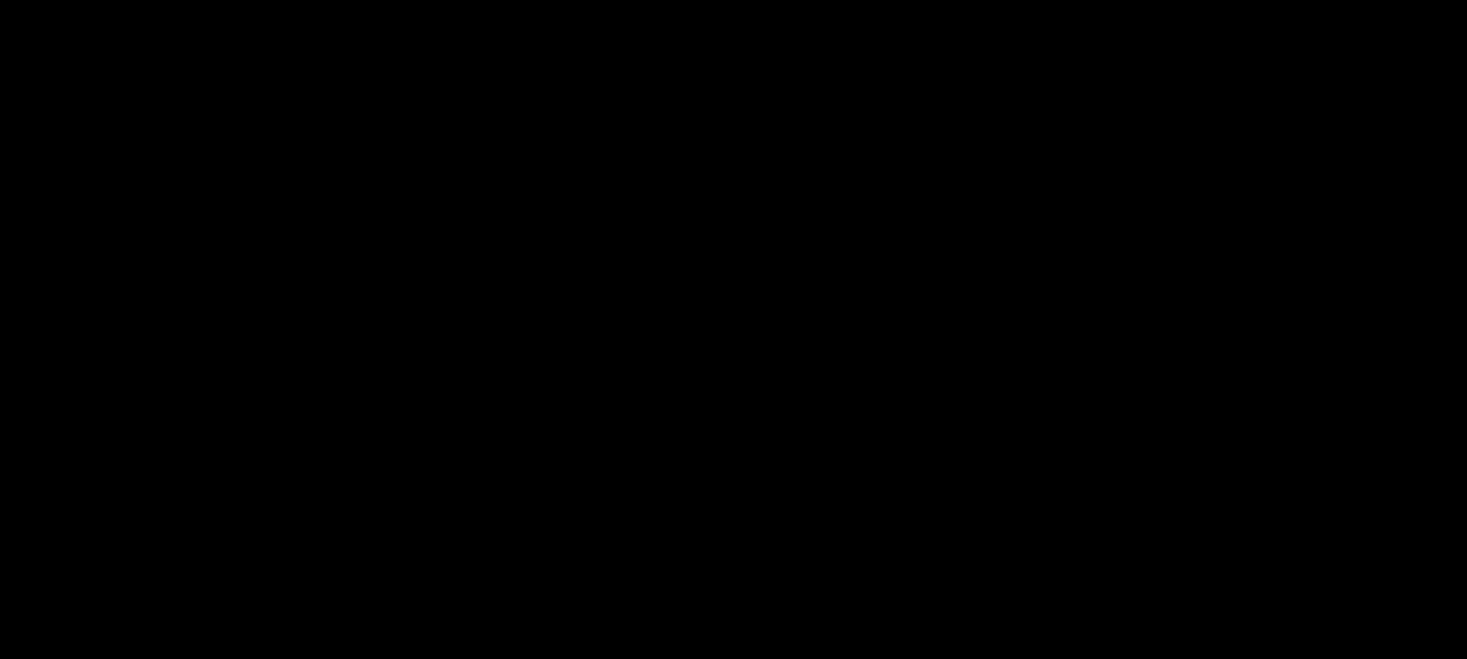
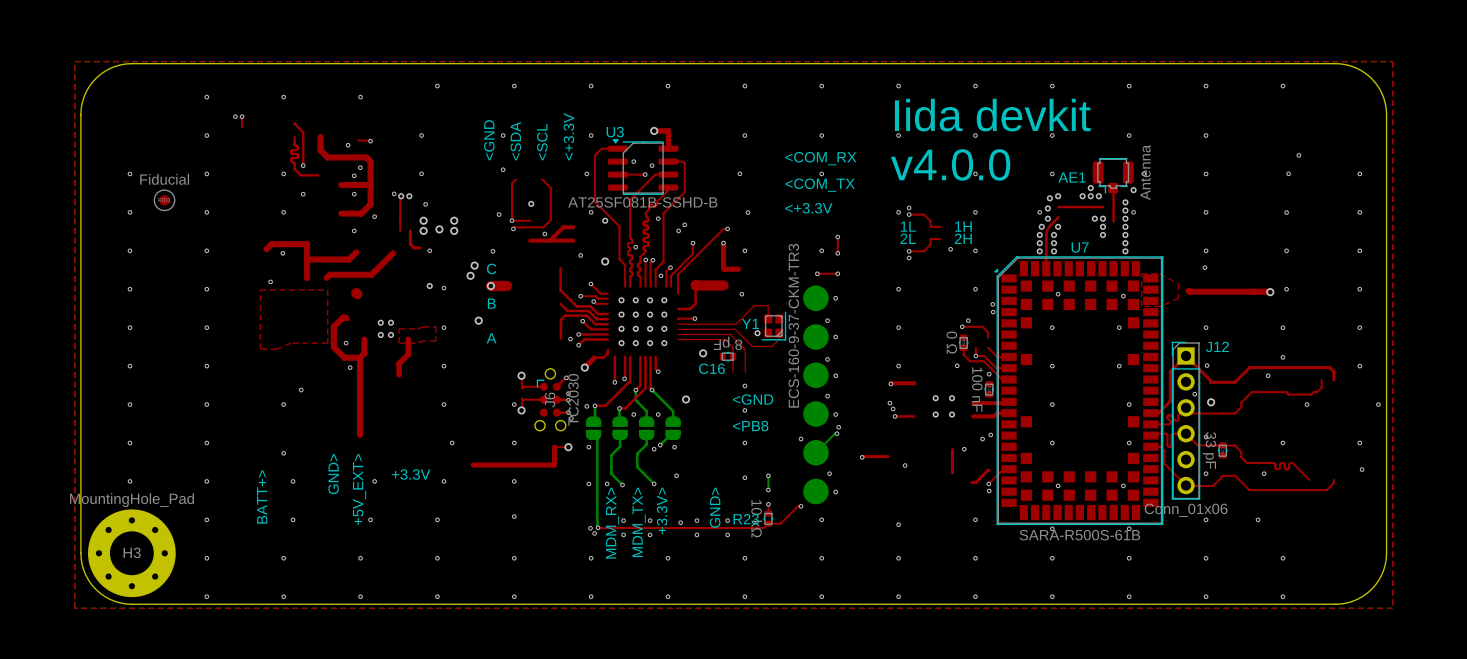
top zone outline: none -> (74, 61) (1392, 61) (1392, 608) (74, 608) (74, 61)
board edge: none -> (131, 63) (1335, 63) (1352, 66) (1367, 74) (1375, 82) (1383, 97) (1386, 108) (1386, 553) (1383, 570) (1375, 585) (1362, 596) (1346, 602) (1335, 604) (131, 604) (115, 601) (100, 593) (92, 585) (83, 570) (81, 558) (80, 114) (83, 97) (95, 78) (115, 66) (131, 63)
via: none -> (437, 86)
via: none -> (514, 86)
via: none -> (591, 86)
via: none -> (668, 86)
via: none -> (744, 86)
via: none -> (821, 86)
via: none -> (898, 86)
via: none -> (975, 86)
via: none -> (1052, 86)
via: none -> (1129, 86)
via: none -> (1206, 86)
via: none -> (1282, 86)
via: none -> (206, 97)
via: none -> (283, 97)
via: none -> (360, 97)
text: none -> Iida devkit (992, 115)
via: none -> (235, 116)
top track: none -> (242, 116) (242, 126)
via: none -> (242, 116)
top track: none -> (294, 123) (303, 132) (303, 165)
text: none -> <+3.3V (568, 136)
top track: none -> (654, 130) (668, 130) (668, 148)
via: none -> (654, 130)
via: none -> (206, 135)
via: none -> (421, 135)
via: none -> (503, 135)
via: none -> (591, 135)
via: none -> (744, 135)
via: none -> (821, 135)
via: none -> (898, 135)
via: none -> (975, 135)
via: none -> (1052, 135)
via: none -> (1129, 135)
via: none -> (1206, 135)
top track: none -> (294, 137) (296, 145)
top track: none -> (320, 137) (320, 150) (327, 157) (366, 157) (370, 161) (370, 204) (361, 213) (341, 213)
text: none -> <GND (489, 140)
text: none -> <SDA (515, 141)
text: none -> <SCL (542, 142)
top track: none -> (358, 140) (370, 141)
via: none -> (370, 141)
top track: none -> (296, 145) (297, 149) (292, 150) (291, 152) (297, 154) (297, 156) (291, 158) (292, 162)
via: none -> (348, 145)
top track: none -> (617, 148) (601, 148) (594, 155) (594, 201) (619, 226) (619, 259) (625, 265) (625, 286)
via: none -> (1298, 155)
text: none -> <COM_RX (820, 158)
via: none -> (633, 161)
top track: none -> (668, 161) (682, 161) (684, 163) (684, 192) (663, 213) (663, 261) (655, 269) (655, 286)
top track: none -> (292, 162) (294, 169) (300, 175) (318, 175)
text: none -> v4.0.0 (950, 164)
via: none -> (303, 165)
via: none -> (652, 165)
U3: none -> AT25SF081B-SSHD-B (643, 166)
via: none -> (360, 167)
via: none -> (503, 169)
via: none -> (129, 173)
via: none -> (206, 173)
via: none -> (283, 173)
via: none -> (421, 173)
via: none -> (586, 173)
via: none -> (739, 173)
via: none -> (821, 173)
via: none -> (975, 173)
via: none -> (1052, 173)
via: none -> (1143, 173)
via: none -> (1206, 173)
via: none -> (1288, 173)
via: none -> (1359, 173)
top track: none -> (617, 174) (645, 174)
via: none -> (645, 174)
top track: none -> (668, 174) (655, 174) (630, 199) (630, 237) (632, 242) (628, 243) (630, 250) (627, 252) (628, 255) (632, 256) (630, 260) (632, 266) (630, 270) (632, 274) (630, 276) (630, 286)
via: none -> (354, 175)
AE1: none -> Antenna (1113, 175)
top track: none -> (516, 179) (511, 183) (511, 220) (530, 220)
top track: none -> (542, 179) (550, 187) (550, 220) (543, 227) (513, 228)
text: none -> <COM_TX (820, 185)
top track: none -> (341, 185) (370, 185)
top track: none -> (668, 187) (668, 190) (656, 202) (656, 205) (654, 206) (650, 204) (645, 212) (648, 220) (644, 221) (643, 224) (647, 225) (648, 228) (644, 229) (643, 232) (647, 233) (648, 236) (644, 238) (643, 240) (647, 242) (648, 244) (643, 246) (645, 251) (640, 256) (640, 262) (637, 264) (640, 268) (637, 274) (640, 276) (640, 286)
via: none -> (1090, 188)
top track: none -> (1113, 188) (1113, 221)
via: none -> (1133, 190)
via: none -> (394, 193)
via: none -> (303, 194)
via: none -> (354, 194)
top track: none -> (401, 196) (400, 230)
via: none -> (401, 196)
via: none -> (409, 196)
via: none -> (1058, 196)
via: none -> (1082, 196)
via: none -> (1090, 196)
via: none -> (1098, 196)
via: none -> (1049, 198)
part: none -> Fiducial (164, 200)
via: none -> (1125, 202)
via: none -> (531, 203)
via: none -> (425, 204)
via: none -> (909, 207)
top track: none -> (1058, 207) (1103, 207)
text: none -> <+3.3V (808, 208)
via: none -> (1047, 208)
via: none -> (1125, 210)
via: none -> (129, 212)
via: none -> (206, 212)
via: none -> (283, 212)
via: none -> (591, 212)
via: none -> (748, 212)
via: none -> (898, 212)
via: none -> (975, 212)
via: none -> (1039, 212)
via: none -> (1133, 212)
via: none -> (1206, 212)
via: none -> (1286, 212)
via: none -> (1359, 212)
via: none -> (499, 214)
top track: none -> (909, 214) (923, 214) (930, 221) (930, 226) (940, 226)
via: none -> (909, 214)
via: none -> (374, 216)
top track: none -> (1058, 217) (1046, 231) (1046, 268)
via: none -> (658, 218)
via: none -> (1047, 218)
via: none -> (1094, 218)
via: none -> (1102, 218)
via: none -> (1125, 218)
via: none -> (423, 220)
via: none -> (454, 220)
via: none -> (511, 220)
via: none -> (605, 220)
via: none -> (684, 224)
text: none -> 1L (908, 226)
text: none -> 1H (963, 226)
via: none -> (1041, 226)
via: none -> (1058, 226)
via: none -> (1102, 226)
via: none -> (1125, 226)
top track: none -> (573, 227) (563, 227) (550, 240)
via: none -> (513, 228)
top track: none -> (727, 228) (723, 228) (678, 274) (678, 293)
via: none -> (727, 228)
via: none -> (439, 229)
via: none -> (354, 230)
top track: none -> (410, 230) (410, 244) (414, 247) (420, 247)
via: none -> (423, 230)
via: none -> (454, 230)
via: none -> (678, 230)
via: none -> (544, 233)
via: none -> (1039, 235)
via: none -> (1054, 235)
via: none -> (1102, 235)
via: none -> (1125, 235)
top track: none -> (837, 237) (837, 253)
via: none -> (837, 237)
text: none -> 2L (908, 238)
text: none -> 2H (963, 238)
top track: none -> (940, 239) (930, 239) (930, 244) (923, 251) (909, 251)
top track: none -> (530, 240) (573, 240)
top track: none -> (692, 243) (692, 253) (670, 275) (670, 286)
via: none -> (692, 243)
top track: none -> (723, 243) (723, 268) (738, 269)
via: none -> (723, 243)
via: none -> (1039, 243)
via: none -> (1054, 243)
via: none -> (1125, 243)
via: none -> (635, 247)
top track: none -> (266, 249) (271, 244) (307, 244) (307, 277)
via: none -> (950, 249)
via: none -> (129, 250)
via: none -> (206, 250)
via: none -> (429, 250)
via: none -> (744, 250)
via: none -> (821, 250)
via: none -> (975, 250)
via: none -> (1206, 250)
via: none -> (1286, 250)
via: none -> (1359, 250)
via: none -> (492, 251)
via: none -> (909, 251)
via: none -> (1039, 251)
via: none -> (1054, 251)
via: none -> (1125, 251)
top track: none -> (356, 252) (349, 259) (307, 259)
via: none -> (282, 253)
top track: none -> (393, 253) (371, 274) (329, 274) (326, 277)
via: none -> (837, 253)
via: none -> (580, 255)
via: none -> (909, 257)
top track: none -> (645, 259) (645, 286)
via: none -> (645, 259)
top track: none -> (652, 260) (650, 262) (650, 286)
via: none -> (652, 260)
via: none -> (605, 261)
via: none -> (474, 265)
top track: none -> (670, 267) (666, 271) (665, 286)
via: none -> (670, 267)
via: none -> (1204, 267)
text: none -> C (491, 268)
top track: none -> (560, 268) (560, 290) (576, 306) (590, 306) (598, 314) (607, 314)
top track: none -> (817, 273) (837, 273)
via: none -> (817, 273)
via: none -> (837, 273)
top zone outline: none -> (1141, 273) (1141, 306) (1160, 306) (1178, 298) (1178, 283) (1160, 273) (1141, 273)
via: none -> (470, 275)
via: none -> (661, 275)
via: none -> (270, 281)
top track: none -> (590, 283) (600, 293) (607, 293)
via: none -> (590, 283)
top track: none -> (723, 285) (695, 285) (695, 303) (690, 308) (678, 308)
via: none -> (429, 286)
top track: none -> (490, 286) (507, 286)
via: none -> (490, 286)
via: none -> (444, 288)
via: none -> (129, 289)
via: none -> (206, 289)
via: none -> (898, 289)
via: none -> (975, 289)
via: none -> (1286, 289)
via: none -> (1359, 289)
top zone outline: none -> (260, 290) (260, 349) (276, 349) (291, 343) (327, 343) (327, 290) (260, 290)
top track: none -> (1188, 290) (1270, 292)
via: none -> (1270, 292)
top track: none -> (356, 293) (357, 294)
via: none -> (741, 294)
via: none -> (1058, 294)
top track: none -> (580, 296) (607, 298)
via: none -> (580, 296)
via: none -> (1123, 296)
part: none -> (815, 298)
via: none -> (835, 298)
via: none -> (621, 300)
via: none -> (635, 300)
via: none -> (650, 300)
via: none -> (664, 300)
top track: none -> (593, 301) (595, 303) (607, 303)
via: none -> (593, 301)
text: none -> B (491, 303)
top track: none -> (560, 303) (567, 311) (588, 311) (596, 319) (607, 319)
via: none -> (992, 304)
via: none -> (993, 312)
via: none -> (621, 314)
via: none -> (635, 314)
via: none -> (650, 314)
via: none -> (664, 314)
top track: none -> (694, 318) (678, 319)
via: none -> (694, 318)
top track: none -> (768, 318) (767, 305) (754, 305) (735, 324) (678, 324)
top track: none -> (347, 319) (343, 317) (333, 326) (333, 347) (344, 357) (360, 357)
via: none -> (478, 320)
via: none -> (827, 320)
via: none -> (968, 320)
top track: none -> (582, 321) (590, 329) (607, 329)
via: none -> (582, 321)
via: none -> (380, 322)
via: none -> (390, 322)
top track: none -> (607, 324) (595, 324) (586, 315) (565, 315) (560, 320) (560, 338)
top zone outline: none -> (423, 326) (417, 328) (399, 328) (399, 343) (435, 341) (435, 326) (423, 326)
Y1: none -> ECS-160-9-37-CKM-TR3 (773, 326)
top track: none -> (962, 326) (982, 326) (988, 332) (988, 337)
via: none -> (962, 326)
via: none -> (129, 327)
via: none -> (206, 327)
via: none -> (444, 327)
via: none -> (898, 327)
via: none -> (1052, 327)
via: none -> (1119, 327)
via: none -> (1206, 327)
via: none -> (1282, 327)
via: none -> (1359, 327)
via: none -> (621, 328)
via: none -> (635, 328)
via: none -> (650, 328)
via: none -> (664, 328)
top track: none -> (678, 329) (735, 329) (752, 346) (772, 346) (779, 339) (779, 333)
via: none -> (757, 333)
via: none -> (380, 334)
via: none -> (390, 334)
top track: none -> (578, 334) (607, 334)
via: none -> (578, 334)
top track: none -> (678, 334) (730, 334) (745, 349) (745, 372)
part: none -> (815, 337)
via: none -> (835, 337)
text: none -> A (491, 338)
top track: none -> (364, 339) (364, 353) (360, 357)
top track: none -> (408, 339) (408, 354) (399, 363) (399, 374)
via: none -> (570, 339)
top track: none -> (607, 339) (584, 339) (578, 345)
top track: none -> (678, 339) (725, 339) (733, 347) (733, 372)
part: none -> 0 Ω (963, 342)
via: none -> (346, 343)
via: none -> (621, 343)
via: none -> (635, 343)
via: none -> (650, 343)
via: none -> (664, 343)
via: none -> (578, 345)
top track: none -> (963, 347) (963, 354) (970, 361) (983, 361) (1002, 379) (1009, 379)
top track: none -> (975, 347) (975, 355) (984, 355) (996, 368) (1009, 368)
top track: none -> (988, 347) (997, 357) (1009, 357)
top track: none -> (607, 349) (607, 353) (603, 357) (594, 357) (584, 367)
via: none -> (703, 353)
via: none -> (975, 355)
top track: none -> (614, 356) (614, 382)
top track: none -> (625, 356) (624, 378)
top track: none -> (630, 356) (630, 381) (605, 405) (594, 405)
top track: none -> (640, 356) (640, 385) (635, 390)
top track: none -> (645, 356) (645, 388) (625, 408) (619, 408)
top track: none -> (650, 356) (652, 390)
top track: none -> (655, 356) (655, 369) (658, 371)
C16: none -> 8 pF (727, 356)
top track: none -> (360, 357) (360, 434)
via: none -> (1282, 357)
via: none -> (827, 359)
via: none -> (957, 365)
via: none -> (1207, 365)
via: none -> (129, 366)
via: none -> (206, 366)
via: none -> (444, 366)
via: none -> (898, 366)
via: none -> (1052, 366)
via: none -> (1119, 366)
via: none -> (1359, 366)
via: none -> (350, 367)
via: none -> (584, 367)
via: none -> (658, 371)
via: none -> (989, 374)
top track: none -> (521, 375) (522, 388) (523, 386) (543, 386)
via: none -> (521, 375)
part: none -> (815, 375)
via: none -> (835, 375)
via: none -> (1268, 375)
top track: none -> (566, 377) (556, 386)
via: none -> (566, 377)
via: none -> (624, 378)
top track: none -> (1321, 379) (1321, 387) (1311, 394) (1251, 392) (1241, 402) (1241, 407) (1234, 413) (1191, 413) (1186, 407) (1178, 415) (1177, 420) (1169, 414) (1167, 417) (1170, 421) (1169, 424) (1150, 424)
top track: none -> (1333, 379) (1333, 371) (1329, 367) (1249, 367) (1234, 382) (1210, 382) (1186, 355) (1170, 371) (1170, 401) (1158, 413) (1150, 413)
via: none -> (614, 382)
via: none -> (890, 383)
top track: none -> (914, 383) (890, 383)
via: none -> (744, 385)
part: none -> 100 nF (989, 389)
via: none -> (301, 390)
bottom track: none -> (635, 390) (635, 400) (646, 411) (646, 421)
via: none -> (635, 390)
bottom track: none -> (652, 390) (673, 411) (673, 421)
via: none -> (652, 390)
U7: none -> SARA-R500S-61B (1078, 390)
via: none -> (568, 393)
via: none -> (1194, 394)
via: none -> (827, 396)
via: none -> (935, 398)
via: none -> (952, 398)
top track: none -> (543, 399) (522, 398) (521, 410)
J6: none -> TC2030 (550, 399)
top track: none -> (556, 399) (568, 400)
via: none -> (686, 399)
text: none -> <GND (753, 399)
via: none -> (568, 400)
top track: none -> (1009, 401) (973, 403)
via: none -> (1211, 402)
via: none -> (889, 403)
via: none -> (129, 404)
via: none -> (206, 404)
via: none -> (283, 404)
via: none -> (444, 404)
via: none -> (514, 404)
via: none -> (1052, 404)
via: none -> (1129, 404)
via: none -> (1307, 404)
via: none -> (1378, 404)
bottom track: none -> (594, 405) (593, 421)
via: none -> (594, 405)
via: none -> (586, 406)
bottom track: none -> (619, 408) (620, 421)
via: none -> (619, 408)
via: none -> (893, 408)
via: none -> (521, 410)
via: none -> (744, 410)
top track: none -> (568, 412) (556, 412)
via: none -> (568, 412)
top track: none -> (1009, 413) (997, 413) (993, 416) (973, 416)
via: none -> (633, 414)
via: none -> (658, 414)
part: none -> (815, 414)
via: none -> (835, 414)
via: none -> (935, 414)
via: none -> (952, 414)
top track: none -> (895, 416) (914, 416)
via: none -> (895, 416)
via: none -> (571, 418)
J12: none -> Conn_01x06 (1186, 420)
text: none -> <PB8 (750, 426)
via: none -> (838, 427)
part: none -> (593, 428)
part: none -> (620, 428)
part: none -> (646, 428)
part: none -> (673, 428)
bottom track: none -> (837, 433) (815, 452)
via: none -> (837, 433)
bottom track: none -> (593, 434) (597, 438) (598, 527)
bottom track: none -> (620, 434) (620, 446) (611, 455) (611, 473) (622, 484)
bottom track: none -> (646, 434) (646, 444) (637, 453) (637, 467) (654, 483)
bottom track: none -> (673, 434) (670, 434) (660, 445)
via: none -> (990, 434)
top track: none -> (1150, 435) (1152, 433) (1166, 433) (1168, 446) (1171, 445) (1173, 433) (1186, 433) (1197, 445) (1234, 445) (1241, 451) (1241, 457) (1247, 462) (1274, 463) (1277, 469) (1279, 468) (1281, 463) (1284, 463) (1284, 468) (1287, 469) (1289, 463) (1292, 462) (1309, 479)
via: none -> (1206, 436)
via: none -> (801, 439)
via: none -> (982, 439)
via: none -> (129, 442)
via: none -> (206, 442)
via: none -> (452, 442)
via: none -> (514, 442)
via: none -> (744, 442)
via: none -> (1052, 442)
via: none -> (1129, 442)
via: none -> (1282, 442)
via: none -> (1359, 442)
via: none -> (660, 445)
top track: none -> (1150, 446) (1160, 446) (1164, 450) (1164, 463) (1186, 485)
top track: none -> (568, 447) (554, 447) (554, 465) (473, 465)
via: none -> (568, 447)
via: none -> (588, 447)
via: none -> (674, 447)
via: none -> (654, 449)
top track: none -> (952, 449) (952, 472)
via: none -> (964, 449)
part: none -> 33 pF (1222, 450)
part: none -> (815, 452)
via: none -> (283, 453)
top track: none -> (888, 456) (862, 457)
via: none -> (862, 457)
via: none -> (905, 465)
top track: none -> (1009, 469) (1003, 469) (988, 483)
via: none -> (1362, 469)
top track: none -> (989, 470) (975, 482) (971, 482)
via: none -> (829, 473)
via: none -> (1206, 473)
via: none -> (1264, 473)
text: none -> +3.3V (411, 474)
via: none -> (676, 475)
bottom track: none -> (768, 475) (768, 490)
via: none -> (768, 475)
text: none -> GND> (333, 474)
via: none -> (744, 477)
top track: none -> (1333, 479) (1333, 482) (1326, 490) (1249, 490) (1234, 475) (1222, 475) (1213, 485) (1186, 485)
via: none -> (129, 481)
via: none -> (206, 481)
via: none -> (293, 481)
via: none -> (374, 481)
via: none -> (444, 481)
via: none -> (514, 481)
via: none -> (588, 483)
via: none -> (607, 483)
via: none -> (654, 483)
via: none -> (988, 483)
via: none -> (622, 484)
via: none -> (1058, 485)
via: none -> (1123, 485)
via: none -> (768, 490)
part: none -> (815, 491)
via: none -> (989, 491)
via: none -> (835, 492)
text: none -> +5V_EXT> (359, 489)
text: none -> BATT+> (262, 496)
top track: none -> (768, 504) (768, 513)
via: none -> (768, 504)
top track: none -> (801, 506) (797, 506) (780, 523) (768, 523) (764, 528) (598, 527)
via: none -> (801, 506)
text: none -> GND> (715, 507)
via: none -> (514, 516)
text: none -> +3.3V> (662, 510)
R23: none -> 10 kΩ (768, 518)
via: none -> (206, 519)
via: none -> (293, 519)
via: none -> (370, 519)
via: none -> (437, 519)
via: none -> (821, 519)
via: none -> (975, 519)
via: none -> (1206, 519)
via: none -> (1258, 519)
via: none -> (623, 520)
via: none -> (650, 520)
via: none -> (697, 520)
via: none -> (727, 520)
via: none -> (680, 522)
text: none -> MDM_TX> (639, 522)
text: none -> MDM_RX> (612, 523)
via: none -> (898, 524)
via: none -> (598, 527)
via: none -> (590, 528)
via: none -> (1052, 528)
via: none -> (1129, 528)
via: none -> (594, 533)
via: none -> (623, 534)
via: none -> (650, 534)
via: none -> (697, 534)
via: none -> (727, 534)
H3: none -> MountingHole_Pad (131, 553)
via: none -> (206, 558)
via: none -> (283, 558)
via: none -> (360, 558)
via: none -> (437, 558)
via: none -> (514, 558)
via: none -> (591, 558)
via: none -> (668, 558)
via: none -> (744, 558)
via: none -> (821, 558)
via: none -> (898, 558)
via: none -> (975, 558)
via: none -> (1052, 558)
via: none -> (1129, 558)
via: none -> (1206, 558)
via: none -> (1282, 558)
via: none -> (206, 596)
via: none -> (283, 596)
via: none -> (360, 596)
via: none -> (437, 596)
via: none -> (514, 596)
via: none -> (591, 596)
via: none -> (668, 596)
via: none -> (744, 596)
via: none -> (821, 596)
via: none -> (898, 596)
via: none -> (975, 596)
via: none -> (1052, 596)
via: none -> (1129, 596)
via: none -> (1206, 596)
via: none -> (1282, 596)

